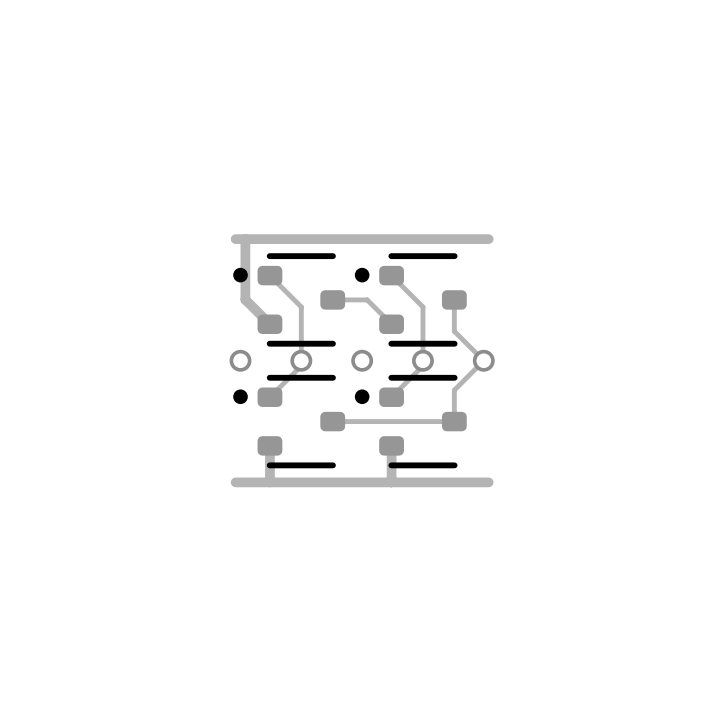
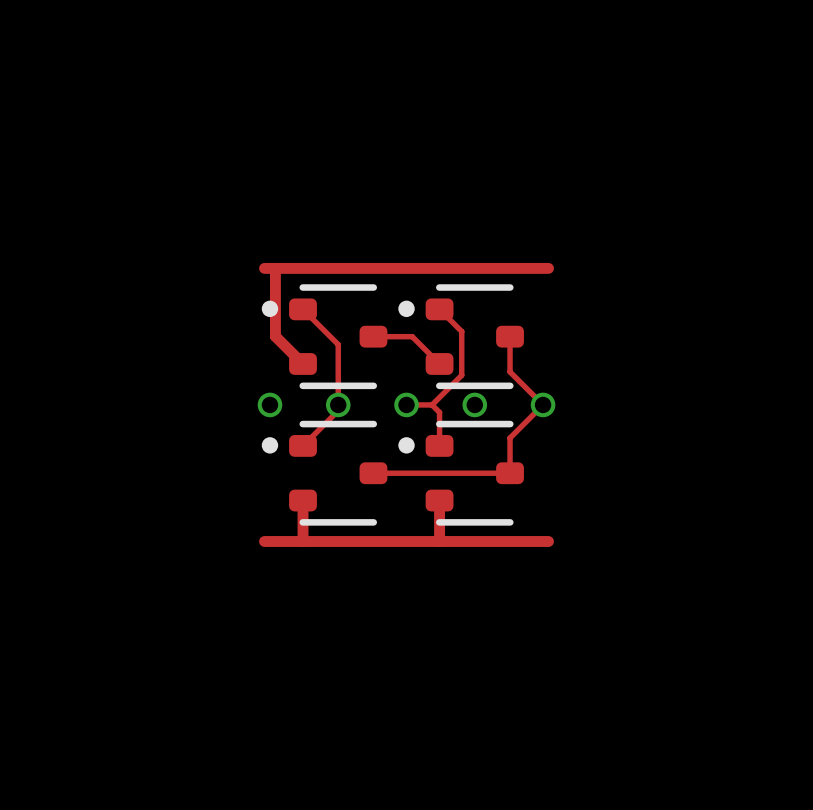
track: (411, 295) (422, 306) (422, 365) (391, 397) -> (461, 331) (461, 375) (432, 404)
track: none -> (406, 404) (432, 404)
track: none -> (432, 404) (439, 412) (439, 445)

